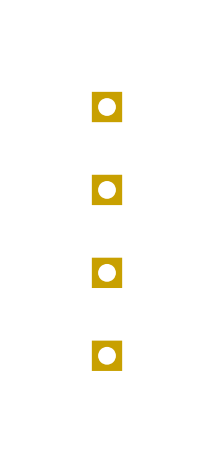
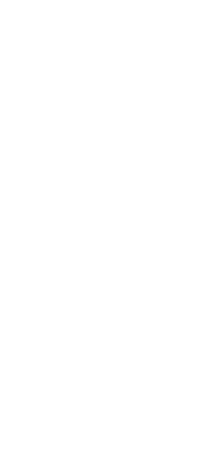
part: (107, 107) -> none
part: (107, 189) -> none
part: (107, 272) -> none
part: (107, 355) -> none

